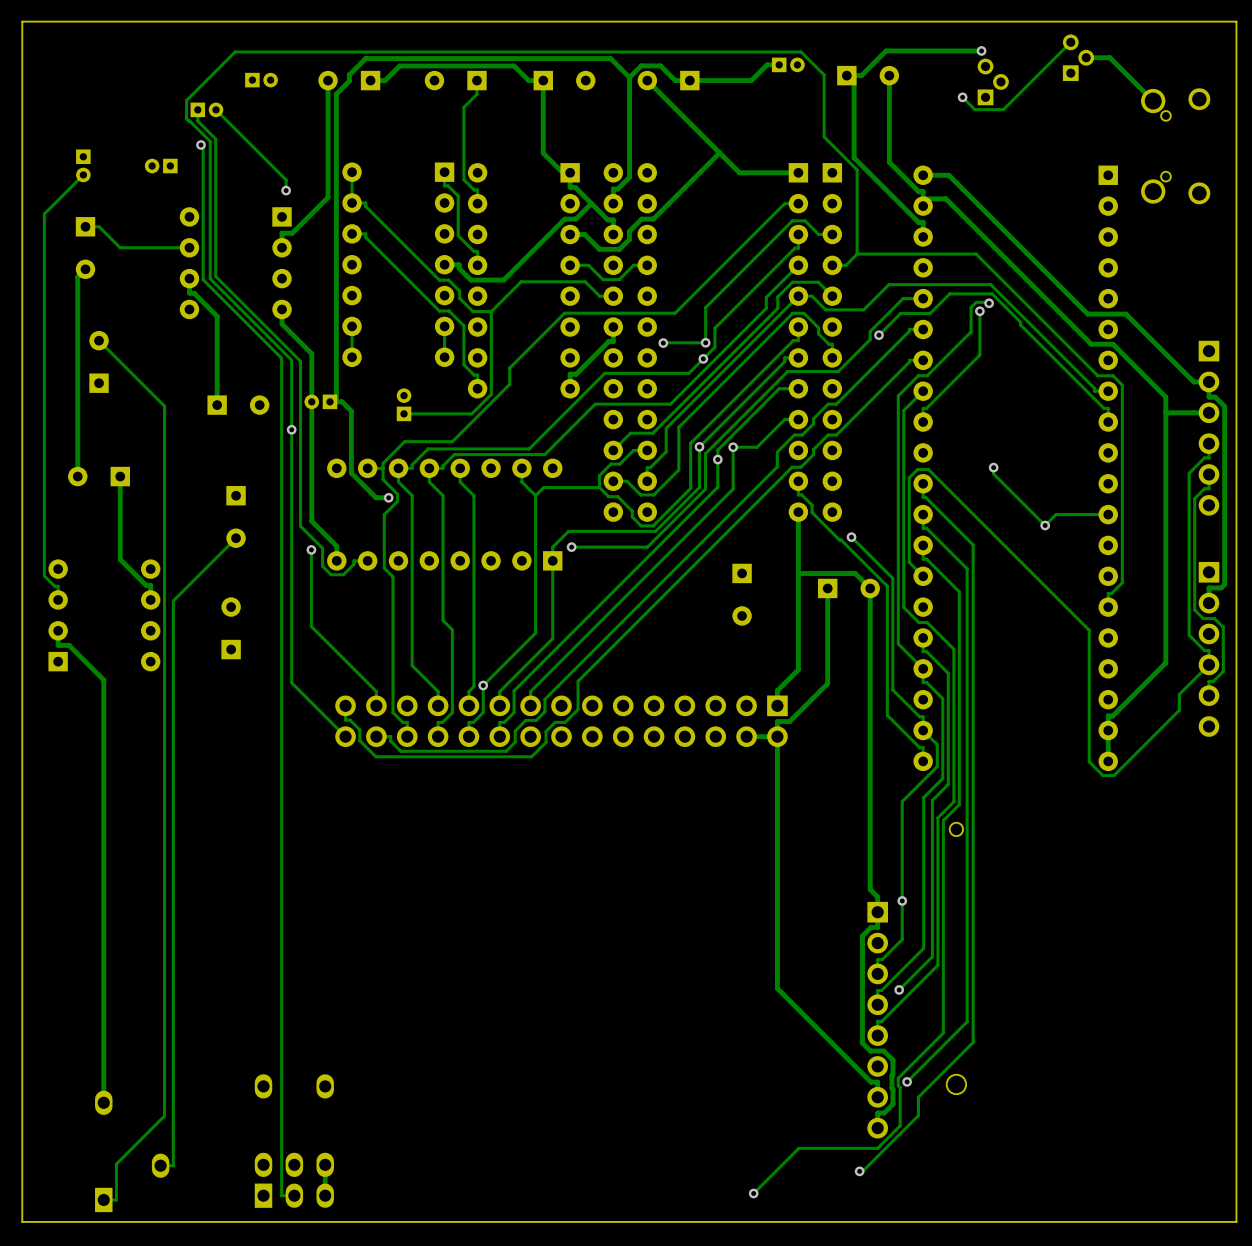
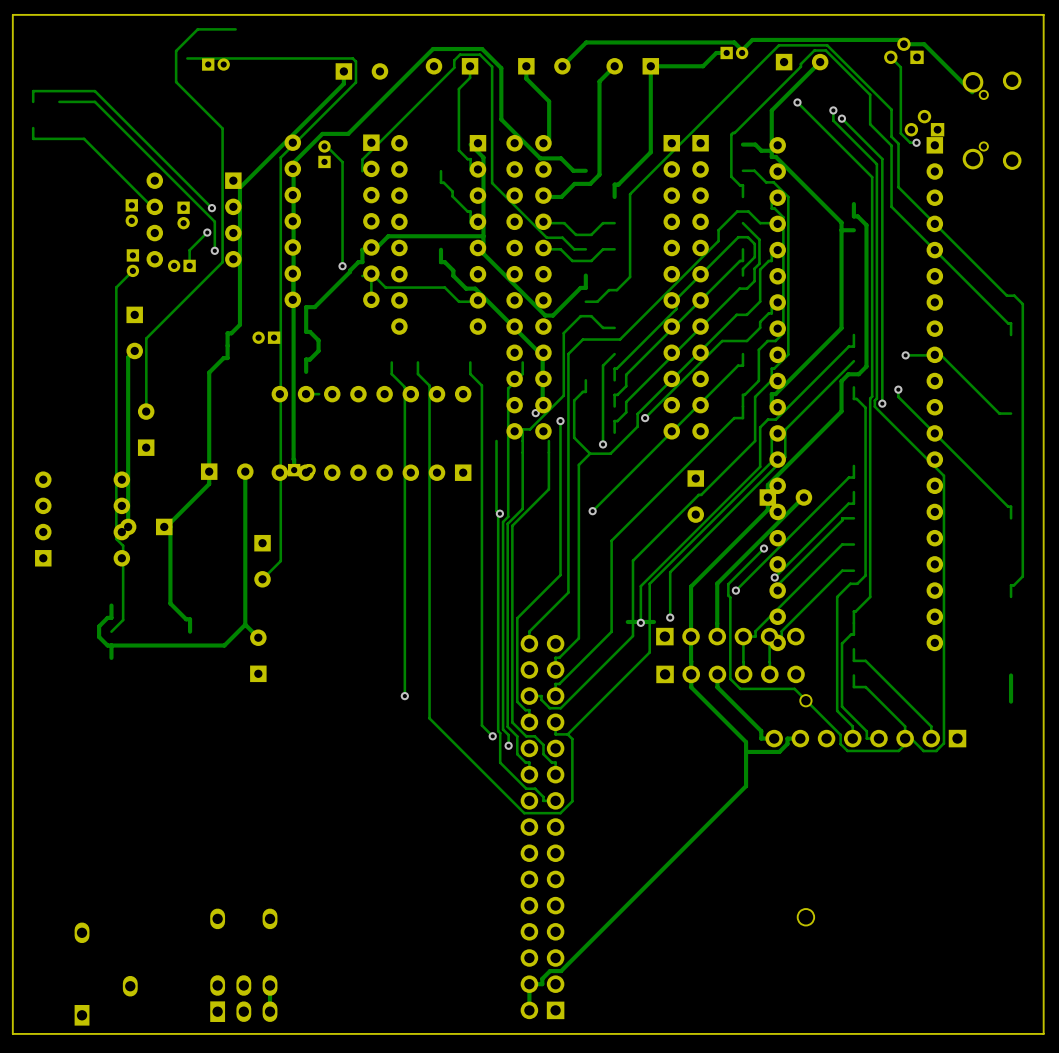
track: none -> (235, 29) (197, 29) (176, 50) (176, 82) (222, 128) (222, 262) (146, 338) (146, 411)
track: (1070, 42) (1003, 109) (974, 109) (962, 97) -> none
track: (981, 50) (886, 50) (861, 75) (846, 75) -> none
via: (981, 50) -> none
part rotation: 0° (1078, 57) -> 90° counterclockwise (903, 50)
track: (1086, 57) (1109, 57) (1153, 101) -> none
track: none -> (742, 50) (752, 39) (899, 39) (903, 44) (924, 44) (972, 92)
track: none -> (742, 50) (734, 42) (586, 42) (562, 66)
track: (779, 64) (767, 64) (751, 80) (675, 80) (660, 65) (641, 65) (629, 77) -> none
part: (788, 64) -> none
part footprint: [837, 65, 900, 86] -> [720, 46, 749, 60]
track: none -> (726, 52) (716, 52) (703, 66) (650, 66) (650, 152) (618, 184) (614, 184) (614, 196)
track: none -> (890, 57) (900, 67) (900, 133) (910, 142) (916, 142)
track: none -> (187, 58) (352, 58) (355, 61) (355, 82) (280, 157) (280, 561) (262, 579)
track: (854, 75) (854, 157) (918, 222) (923, 222) (923, 236) -> none
track: (889, 75) (889, 162) (918, 191) (923, 191) (923, 206) -> none
track: (629, 77) (629, 177) (617, 189) (613, 189) (613, 203) -> none
track: (629, 77) (610, 58) (365, 58) (349, 75) (349, 81) (336, 94) (336, 401) -> none
part: none -> (802, 62)
track: none -> (820, 62) (771, 110) (771, 156) (775, 156) (841, 222) (841, 328) (775, 394) (771, 394) (771, 406)
track: (328, 80) (328, 197) (292, 233) (282, 233) (282, 247) -> none
part: (349, 80) -> none
track: (370, 80) (385, 80) (399, 65) (514, 65) (528, 80) (543, 80) (543, 153) (570, 180) -> none
part rotation: 0° (455, 80) -> 180° (361, 71)
track: (476, 80) (476, 94) (463, 107) (463, 179) (474, 189) (477, 189) (477, 203) -> (470, 66) (470, 77) (458, 89) (458, 150) (467, 159) (470, 159) (470, 170)
part rotation: 0° (564, 80) -> 180° (452, 66)
track: (647, 80) (739, 172) (798, 172) -> none
part rotation: 0° (668, 80) -> 180° (544, 66)
part rotation: 0° (993, 81) -> 90° counterclockwise (924, 123)
part position: (993, 81) -> (924, 123)
track: none -> (526, 66) (526, 78) (549, 101) (549, 144)
track: none -> (614, 66) (599, 81) (599, 174) (590, 183) (574, 183) (561, 196) (549, 196)
part: none -> (632, 66)
track: none -> (343, 71) (343, 83) (239, 187) (239, 324) (231, 333) (227, 333) (227, 358) (223, 358) (209, 372) (209, 484) (170, 522) (170, 603) (186, 619) (190, 619) (190, 631)
via: (962, 97) -> none
track: (197, 109) (197, 121) (215, 139) (215, 276) (300, 361) (300, 526) (322, 548) (322, 566) (331, 574) (343, 574) (353, 564) (353, 560) (367, 560) -> none
part: (206, 109) -> none
track: (216, 109) (286, 179) (286, 190) -> none
track: none -> (33, 101) (33, 91) (94, 91) (211, 208)
track: none -> (59, 101) (94, 101) (214, 221) (214, 250)
track: none -> (797, 102) (872, 177) (870, 597) (853, 611) (853, 634) (851, 634) (842, 643) (842, 706) (866, 731) (866, 738) (878, 738)
via: none -> (797, 102)
track: none -> (833, 110) (833, 120) (876, 164) (876, 398) (874, 406) (943, 475) (943, 743) (936, 751) (923, 751) (911, 738)
via: none -> (833, 110)
track: none -> (841, 118) (882, 159) (882, 403)
via: none -> (841, 118)
track: (201, 144) (203, 147) (203, 279) (281, 358) (281, 1195) (294, 1195) -> none
via: (201, 144) -> none
track: (719, 152) (653, 219) (641, 219) (629, 231) (629, 239) (619, 249) (599, 249) (584, 234) (570, 234) -> none
track: none -> (33, 128) (33, 138) (84, 138) (153, 208)
part: (83, 165) -> none
part: (161, 166) -> none
track: (352, 172) (352, 203) (365, 203) (365, 206) (439, 280) (448, 280) (459, 291) (459, 298) (472, 311) (491, 311) -> none
track: (444, 172) (444, 185) (448, 185) (458, 196) (458, 235) (474, 251) (477, 251) (477, 265) -> none
track: (570, 172) (570, 187) (575, 187) (607, 219) (613, 219) (613, 234) -> none
via: none -> (916, 142)
track: (83, 174) (44, 213) (44, 575) (54, 586) (58, 586) (58, 599) -> none
track: none -> (470, 144) (483, 157) (483, 253) (545, 315) (553, 315) (580, 287) (585, 287) (585, 275)
track: none -> (742, 144) (755, 144) (761, 150) (771, 150)
track: (923, 175) (948, 175) (1087, 314) (1125, 314) (1193, 381) (1208, 381) (1208, 397) (1215, 397) (1224, 406) (1224, 584) (1221, 587) (1208, 587) (1208, 603) -> none
track: none -> (324, 146) (326, 146) (342, 162) (342, 266)
part: none -> (324, 154)
via: (286, 190) -> none
track: (923, 198) (945, 198) (1091, 344) (1112, 344) (1165, 397) (1165, 662) (1112, 715) (1108, 715) (1108, 761) -> none
track: (591, 203) (575, 219) (564, 219) (503, 280) (470, 280) (459, 268) (459, 264) (444, 264) -> none
track: (798, 203) (784, 203) (675, 313) (564, 313) (509, 368) (509, 384) (452, 441) (404, 441) (383, 463) (383, 479) (397, 494) (397, 501) (384, 514) (384, 568) (392, 576) (392, 712) (402, 722) (407, 722) (407, 736) -> none
track: none -> (362, 171) (362, 159) (454, 67) (454, 60) (460, 54) (479, 54) (492, 66) (492, 183) (546, 237) (562, 237) (574, 249) (585, 249)
track: none -> (440, 171) (440, 182) (443, 182) (452, 191) (452, 196) (467, 211) (470, 211) (470, 223)
track: none -> (585, 170) (573, 170) (561, 158) (540, 158) (501, 119) (501, 68) (482, 49) (433, 49) (348, 133) (322, 133) (293, 162) (294, 470)
track: none -> (742, 170) (754, 170) (766, 182) (773, 182) (788, 197) (788, 354) (774, 368) (771, 368) (771, 380) (755, 396) (755, 441) (632, 560) (632, 636) (560, 708) (549, 708) (541, 699) (541, 696) (529, 696)
track: (85, 226) (99, 226) (120, 247) (189, 247) -> none
track: (352, 233) (365, 233) (365, 237) (439, 310) (449, 310) (463, 325) (463, 364) (474, 375) (477, 375) (477, 388) -> none
track: (798, 234) (798, 248) (794, 248) (714, 328) (714, 347) (688, 373) (604, 373) (529, 448) (428, 448) (412, 464) (412, 468) (398, 468) (398, 481) (412, 495) (412, 665) (438, 691) (438, 705) -> none
track: (832, 234) (818, 234) (805, 220) (792, 220) (705, 307) (705, 342) (663, 343) -> none
track: none -> (742, 196) (742, 185) (740, 185) (731, 176) (731, 134) (800, 66) (800, 64) (814, 50) (825, 50) (870, 94) (870, 124) (891, 145) (891, 206) (1008, 323) (1011, 323) (1011, 334)
track: none -> (771, 196) (771, 208) (774, 208) (783, 217) (783, 333) (775, 341) (767, 341) (758, 349) (758, 380) (742, 394) (742, 418) (734, 418) (611, 540) (611, 631) (559, 683) (555, 683) (555, 696)
track: none -> (853, 204) (853, 216) (857, 216) (866, 225) (866, 366) (858, 374) (848, 374) (841, 381) (841, 411) (767, 485) (767, 509) (691, 586) (691, 687) (746, 742) (746, 786) (561, 971) (550, 971) (542, 978) (542, 984) (529, 984) (529, 1010)
part: (85, 248) -> none
via: none -> (211, 208)
track: (857, 254) (976, 254) (1097, 375) (1112, 375) (1122, 385) (1122, 582) (1111, 593) (1108, 593) (1108, 607) -> none
part: none -> (131, 213)
part: none -> (183, 215)
track: (647, 265) (633, 265) (619, 279) (602, 279) (588, 265) (570, 265) -> none
track: (798, 265) (766, 297) (766, 308) (670, 404) (595, 404) (544, 454) (454, 454) (443, 468) (429, 468) (429, 481) (443, 495) (443, 620) (452, 629) (452, 712) (442, 722) (438, 722) (438, 736) -> none
track: (832, 265) (846, 265) (857, 254) (857, 169) (824, 136) (824, 74) (801, 51) (235, 51) (186, 100) (186, 118) (210, 141) (210, 278) (291, 360) (291, 682) (345, 736) -> none
track: none -> (614, 223) (603, 223) (591, 234) (575, 234) (564, 223) (549, 223)
track: none -> (742, 223) (759, 239) (759, 263) (754, 268) (754, 281) (747, 288) (739, 288) (626, 402) (626, 412) (617, 421) (614, 421) (614, 432)
track: none -> (771, 223) (760, 223) (748, 211) (737, 211) (718, 230) (718, 241) (620, 339) (582, 339) (568, 354) (568, 592) (529, 631) (529, 643)
track: (85, 269) (77, 277) (77, 476) -> (134, 350) (128, 357) (128, 526)
track: none -> (853, 230) (841, 230)
track: (189, 278) (189, 293) (194, 293) (217, 316) (217, 405) -> none
track: none -> (207, 232) (189, 250) (189, 265)
via: none -> (207, 232)
track: none -> (483, 236) (388, 236) (374, 249) (362, 249) (362, 262) (358, 262) (314, 307) (306, 307) (306, 331) (310, 331) (318, 340) (318, 351) (310, 359) (306, 359) (306, 371)
track: (613, 296) (599, 296) (585, 281) (521, 281) (491, 311) -> none
track: (832, 296) (818, 282) (792, 282) (777, 296) (777, 308) (652, 433) (630, 433) (613, 450) -> none
track: none -> (614, 249) (603, 249) (591, 260) (572, 260) (560, 249) (549, 249)
track: none -> (742, 249) (742, 260) (740, 260) (626, 374) (626, 386) (617, 394) (614, 394) (614, 406)
track: none -> (771, 249) (771, 260) (768, 260) (760, 269) (760, 301) (746, 314) (736, 314) (637, 413) (637, 426) (610, 453) (590, 453)
track: none -> (440, 249) (440, 262) (444, 262) (453, 270) (453, 275) (466, 288) (475, 288) (542, 356) (542, 406) (535, 413)
track: (923, 298) (903, 298) (870, 331) (870, 339) (838, 371) (787, 371) (705, 453) (705, 489) (647, 547) (571, 547) -> none
via: none -> (214, 250)
track: (989, 303) (976, 302) (971, 307) (971, 331) (927, 375) (918, 375) (898, 395) (898, 643) (923, 668) (923, 682) (926, 682) (942, 698) (942, 778) (923, 797) (923, 948) (881, 990) (877, 990) (877, 1004) -> none
via: (989, 303) -> none
track: (282, 309) (282, 324) (311, 353) (311, 521) (336, 546) (336, 560) -> none
track: (491, 311) (491, 394) (471, 413) (404, 413) -> none
track: (979, 311) (979, 355) (926, 408) (923, 408) (923, 422) -> none
via: (979, 311) -> none
part: none -> (132, 263)
part: none -> (181, 265)
via: none -> (342, 266)
track: none -> (132, 270) (116, 287) (116, 538) (123, 545) (123, 620) (111, 631)
track: (613, 327) (613, 341) (608, 341) (576, 374) (570, 374) (570, 388) -> none
track: (798, 327) (798, 340) (793, 340) (690, 443) (690, 488) (653, 525) (641, 525) (632, 516) (632, 511) (617, 496) (608, 496) (599, 487) -> none
track: none -> (742, 275) (742, 268) (754, 257) (754, 244) (747, 237) (738, 237) (676, 299) (676, 309) (614, 368) (614, 380)
track: none -> (362, 275) (374, 275) (385, 287) (444, 287) (458, 301) (470, 301)
track: (923, 329) (909, 329) (836, 404) (828, 404) (813, 418) (813, 423) (802, 435) (794, 435) (777, 452) (777, 466) (544, 699) (544, 711) (536, 720) (525, 720) (515, 731) (515, 742) (506, 751) (400, 751) (390, 741) (390, 736) (376, 736) -> none
track: (878, 335) (900, 313) (930, 313) (949, 293) (992, 293) (1104, 408) (1108, 408) (1108, 422) -> none
via: (878, 335) -> none
track: (99, 340) (164, 406) (164, 1115) (116, 1164) (116, 1199) (103, 1199) -> none
via: (705, 342) -> none
via: (663, 343) -> none
track: (798, 357) (784, 357) (784, 361) (699, 446) (699, 487) (655, 531) (568, 531) (552, 547) (552, 638) (499, 691) (499, 705) -> none
track: (832, 357) (832, 344) (828, 344) (818, 333) (818, 327) (804, 313) (792, 313) (678, 427) (678, 469) (653, 494) (640, 494) (626, 481) (613, 481) -> none
via: (703, 358) -> none
track: none -> (585, 301) (597, 301) (609, 290) (616, 290) (630, 277) (630, 194) (778, 45) (827, 45) (891, 109) (891, 136) (898, 143) (898, 187) (1006, 295) (1014, 295) (1022, 304) (1022, 576) (1013, 585) (1011, 585) (1011, 596)
track: none -> (771, 301) (771, 313) (768, 313) (760, 322) (760, 327) (746, 341) (722, 341) (645, 418)
track: (923, 360) (909, 360) (836, 435) (828, 435) (813, 449) (813, 454) (801, 467) (792, 467) (578, 681) (578, 709) (565, 722) (555, 722) (546, 731) (546, 742) (531, 756) (375, 756) (359, 740) (359, 729) (350, 720) (345, 720) (345, 705) -> none
part: (99, 361) -> none
track: (798, 388) (779, 388) (717, 450) (717, 487) (514, 690) (514, 712) (504, 722) (499, 722) (499, 736) -> none
track: none -> (614, 327) (603, 327) (591, 316) (580, 316) (563, 333) (563, 395) (530, 429) (522, 429) (522, 508) (507, 523) (507, 726) (517, 736) (517, 754) (525, 762) (529, 762) (529, 774)
track: (923, 391) (903, 410) (903, 607) (918, 622) (927, 622) (953, 649) (953, 801) (937, 817) (937, 965) (881, 1021) (877, 1021) (877, 1035) -> none
track: (1108, 391) (1094, 391) (1094, 388) (990, 284) (888, 284) (863, 309) (825, 309) (812, 296) (798, 296) (666, 428) (666, 451) (650, 467) (647, 467) (647, 481) -> none
part: none -> (134, 332)
track: none -> (853, 334) (853, 346) (848, 346) (775, 419) (768, 419) (760, 427) (760, 466) (640, 586) (640, 622)
track: (329, 401) (342, 401) (351, 411) (351, 473) (376, 497) (388, 497) -> none
part: (404, 404) -> none
part: (238, 405) -> none
track: (1208, 412) (1165, 412) -> none
track: (798, 419) (784, 419) (757, 447) (733, 447) (733, 489) (530, 691) (530, 705) -> none
track: none -> (614, 354) (603, 365) (603, 444)
track: none -> (742, 354) (742, 365) (738, 365) (592, 511)
track: none -> (905, 355) (941, 355) (999, 413) (1011, 413)
via: none -> (905, 355)
part: (1208, 428) -> none
via: (291, 429) -> none
track: none -> (853, 361) (785, 429) (785, 457) (670, 572) (670, 617)
track: none -> (391, 362) (391, 374) (404, 387) (404, 696)
track: none -> (417, 362) (417, 374) (429, 385) (429, 718) (524, 813) (560, 813) (572, 801) (572, 739) (567, 734)
track: none -> (470, 362) (470, 374) (481, 385) (481, 725) (492, 736)
track: none -> (522, 362) (522, 374) (508, 388) (508, 516) (503, 521) (503, 729) (508, 735) (508, 745)
track: (1208, 443) (1208, 457) (1204, 457) (1189, 473) (1189, 635) (1204, 650) (1208, 650) (1208, 664) (1179, 694) (1179, 710) (1114, 775) (1102, 775) (1089, 761) (1089, 630) (928, 469) (917, 469) (909, 477) (909, 562) (923, 576) -> none
via: (699, 446) -> none
via: (733, 447) -> none
track: (647, 450) (633, 450) (619, 464) (611, 464) (599, 475) (599, 487) -> none
track: none -> (585, 380) (585, 391) (582, 391) (574, 400) (574, 437) (590, 453)
via: (717, 459) -> none
track: none -> (853, 387) (853, 398) (856, 398) (865, 407) (865, 575) (857, 583) (850, 583) (837, 596) (837, 710) (852, 726) (852, 738)
track: none -> (898, 389) (898, 396) (1008, 506) (1011, 506) (1011, 518)
via: none -> (898, 389)
track: (993, 467) (993, 473) (1045, 525) (1056, 514) (1108, 514) -> none
via: (993, 467) -> none
track: (460, 468) (460, 481) (473, 495) (473, 686) (468, 691) (468, 705) -> none
track: (521, 468) (521, 481) (535, 495) -> none
track: (1208, 474) (1208, 488) (1204, 488) (1194, 498) (1194, 609) (1203, 618) (1214, 618) (1223, 627) (1223, 671) (1213, 681) (1208, 681) (1208, 695) -> none
part: (99, 476) -> none
track: (120, 476) (120, 559) (146, 585) (150, 585) (150, 599) -> none
via: none -> (882, 403)
track: (798, 481) (798, 494) (801, 494) (812, 505) (812, 512) (887, 586) (887, 715) (919, 747) (923, 747) (923, 761) -> none
track: (923, 483) (923, 497) (925, 497) (973, 544) (973, 1042) (918, 1097) (918, 1115) (862, 1171) (859, 1171) -> none
track: (599, 487) (543, 487) (535, 495) -> none
via: none -> (535, 413)
track: (535, 495) (535, 633) (483, 685) (483, 712) (473, 722) (468, 722) (468, 736) -> none
via: none -> (645, 418)
via: (388, 497) -> none
track: none -> (560, 421) (560, 575) (517, 618) (517, 701) (525, 710) (529, 710) (529, 722)
via: none -> (560, 421)
part: none -> (146, 429)
track: (798, 512) (798, 669) (777, 690) (777, 705) -> none
track: none -> (771, 432) (771, 461) (649, 583) (649, 652) (567, 734)
track: (923, 514) (923, 528) (926, 528) (967, 568) (967, 1021) (907, 1081) -> none
part: (236, 516) -> none
track: none -> (496, 441) (496, 511) (499, 513) (498, 731) (500, 733) (500, 762) (526, 788) (535, 788) (543, 797) (543, 800) (555, 800)
track: none -> (548, 441) (548, 489) (512, 525) (512, 722) (526, 736) (534, 736) (543, 745) (543, 754) (551, 762) (555, 762) (555, 774)
via: (1045, 525) -> none
via: none -> (603, 444)
track: (851, 537) (892, 578) (892, 689) (919, 716) (923, 716) (923, 730) (937, 744) (937, 766) (902, 801) (902, 939) (882, 959) (877, 959) (877, 973) -> none
via: (851, 537) -> none
track: (236, 538) (173, 600) (173, 1165) (160, 1165) -> none
track: none -> (590, 453) (578, 464) (578, 638) (559, 657) (555, 657) (555, 669)
track: (923, 545) (923, 559) (926, 559) (959, 591) (959, 804) (943, 820) (943, 1033) (898, 1078) (900, 1087) (900, 1125) (877, 1148) (798, 1148) (753, 1193) -> none
via: (571, 547) -> none
track: (311, 549) (311, 626) (376, 691) (376, 705) -> none
via: (311, 549) -> none
track: none -> (853, 465) (853, 477) (848, 477) (735, 590)
part: none -> (301, 470)
part: none -> (227, 471)
track: none -> (245, 471) (245, 624)
track: (798, 573) (855, 573) (870, 588) (870, 889) (877, 897) (877, 927) (871, 927) (862, 935) (862, 1043) (870, 1051) (883, 1051) (892, 1060) (892, 1104) (884, 1112) (877, 1112) (877, 1128) -> none
track: none -> (853, 492) (853, 503) (848, 503) (774, 577)
track: (827, 588) (827, 683) (789, 721) (777, 721) (777, 988) (871, 1082) (877, 1082) (877, 1097) -> none
part rotation: 0° (848, 588) -> 90° clockwise (695, 496)
part: none -> (785, 497)
track: none -> (803, 497) (717, 583) (717, 636)
part: (742, 594) -> none
via: none -> (592, 511)
via: none -> (499, 513)
track: none -> (853, 518) (842, 518) (842, 520) (773, 589)
part: none -> (146, 526)
part: (231, 628) -> none
track: (58, 630) (58, 645) (69, 645) (103, 680) (103, 1102) -> none
track: (923, 637) (923, 651) (926, 651) (948, 673) (948, 784) (932, 800) (932, 956) (899, 989) -> none
track: none -> (853, 544) (842, 544) (755, 631) (755, 636) (743, 636) (743, 674)
part: (1208, 649) -> none
track: none -> (763, 548) (728, 584) (728, 595) (730, 597) (730, 678) (740, 688) (794, 688) (840, 734) (840, 744) (847, 750) (898, 750) (911, 738)
via: none -> (763, 548)
part: none -> (262, 561)
track: none -> (853, 570) (842, 570) (781, 631) (781, 636) (769, 636) (769, 674)
via: none -> (774, 577)
via: (483, 685) -> none
via: none -> (735, 590)
track: none -> (111, 605) (111, 617) (107, 617) (99, 626) (99, 637) (107, 645) (224, 645) (245, 624)
part rotation: 0° (561, 721) -> 90° clockwise (542, 827)
via: none -> (670, 617)
via: none -> (640, 622)
track: none -> (245, 624) (258, 637)
part: none -> (730, 636)
track: none -> (111, 645) (111, 657)
track: none -> (853, 649) (853, 660) (865, 660) (931, 726) (931, 738)
part: none -> (258, 655)
track: none -> (717, 674) (717, 687) (761, 731) (761, 738) (774, 738)
part: none -> (730, 674)
track: none -> (853, 675) (853, 687) (865, 687) (905, 726) (905, 738) (911, 738)
track: none -> (1011, 675) (1011, 701)
via: none -> (404, 696)
track: none -> (555, 722) (555, 734) (567, 734)
via: none -> (492, 736)
track: none -> (800, 738) (787, 738) (787, 743) (779, 751) (746, 751)
via: none -> (508, 745)
via: (902, 900) -> none
via: (899, 989) -> none
part rotation: 0° (877, 1020) -> 90° clockwise (865, 738)
part position: (877, 1020) -> (865, 738)
via: (907, 1081) -> none
via: (859, 1171) -> none
via: (753, 1193) -> none

